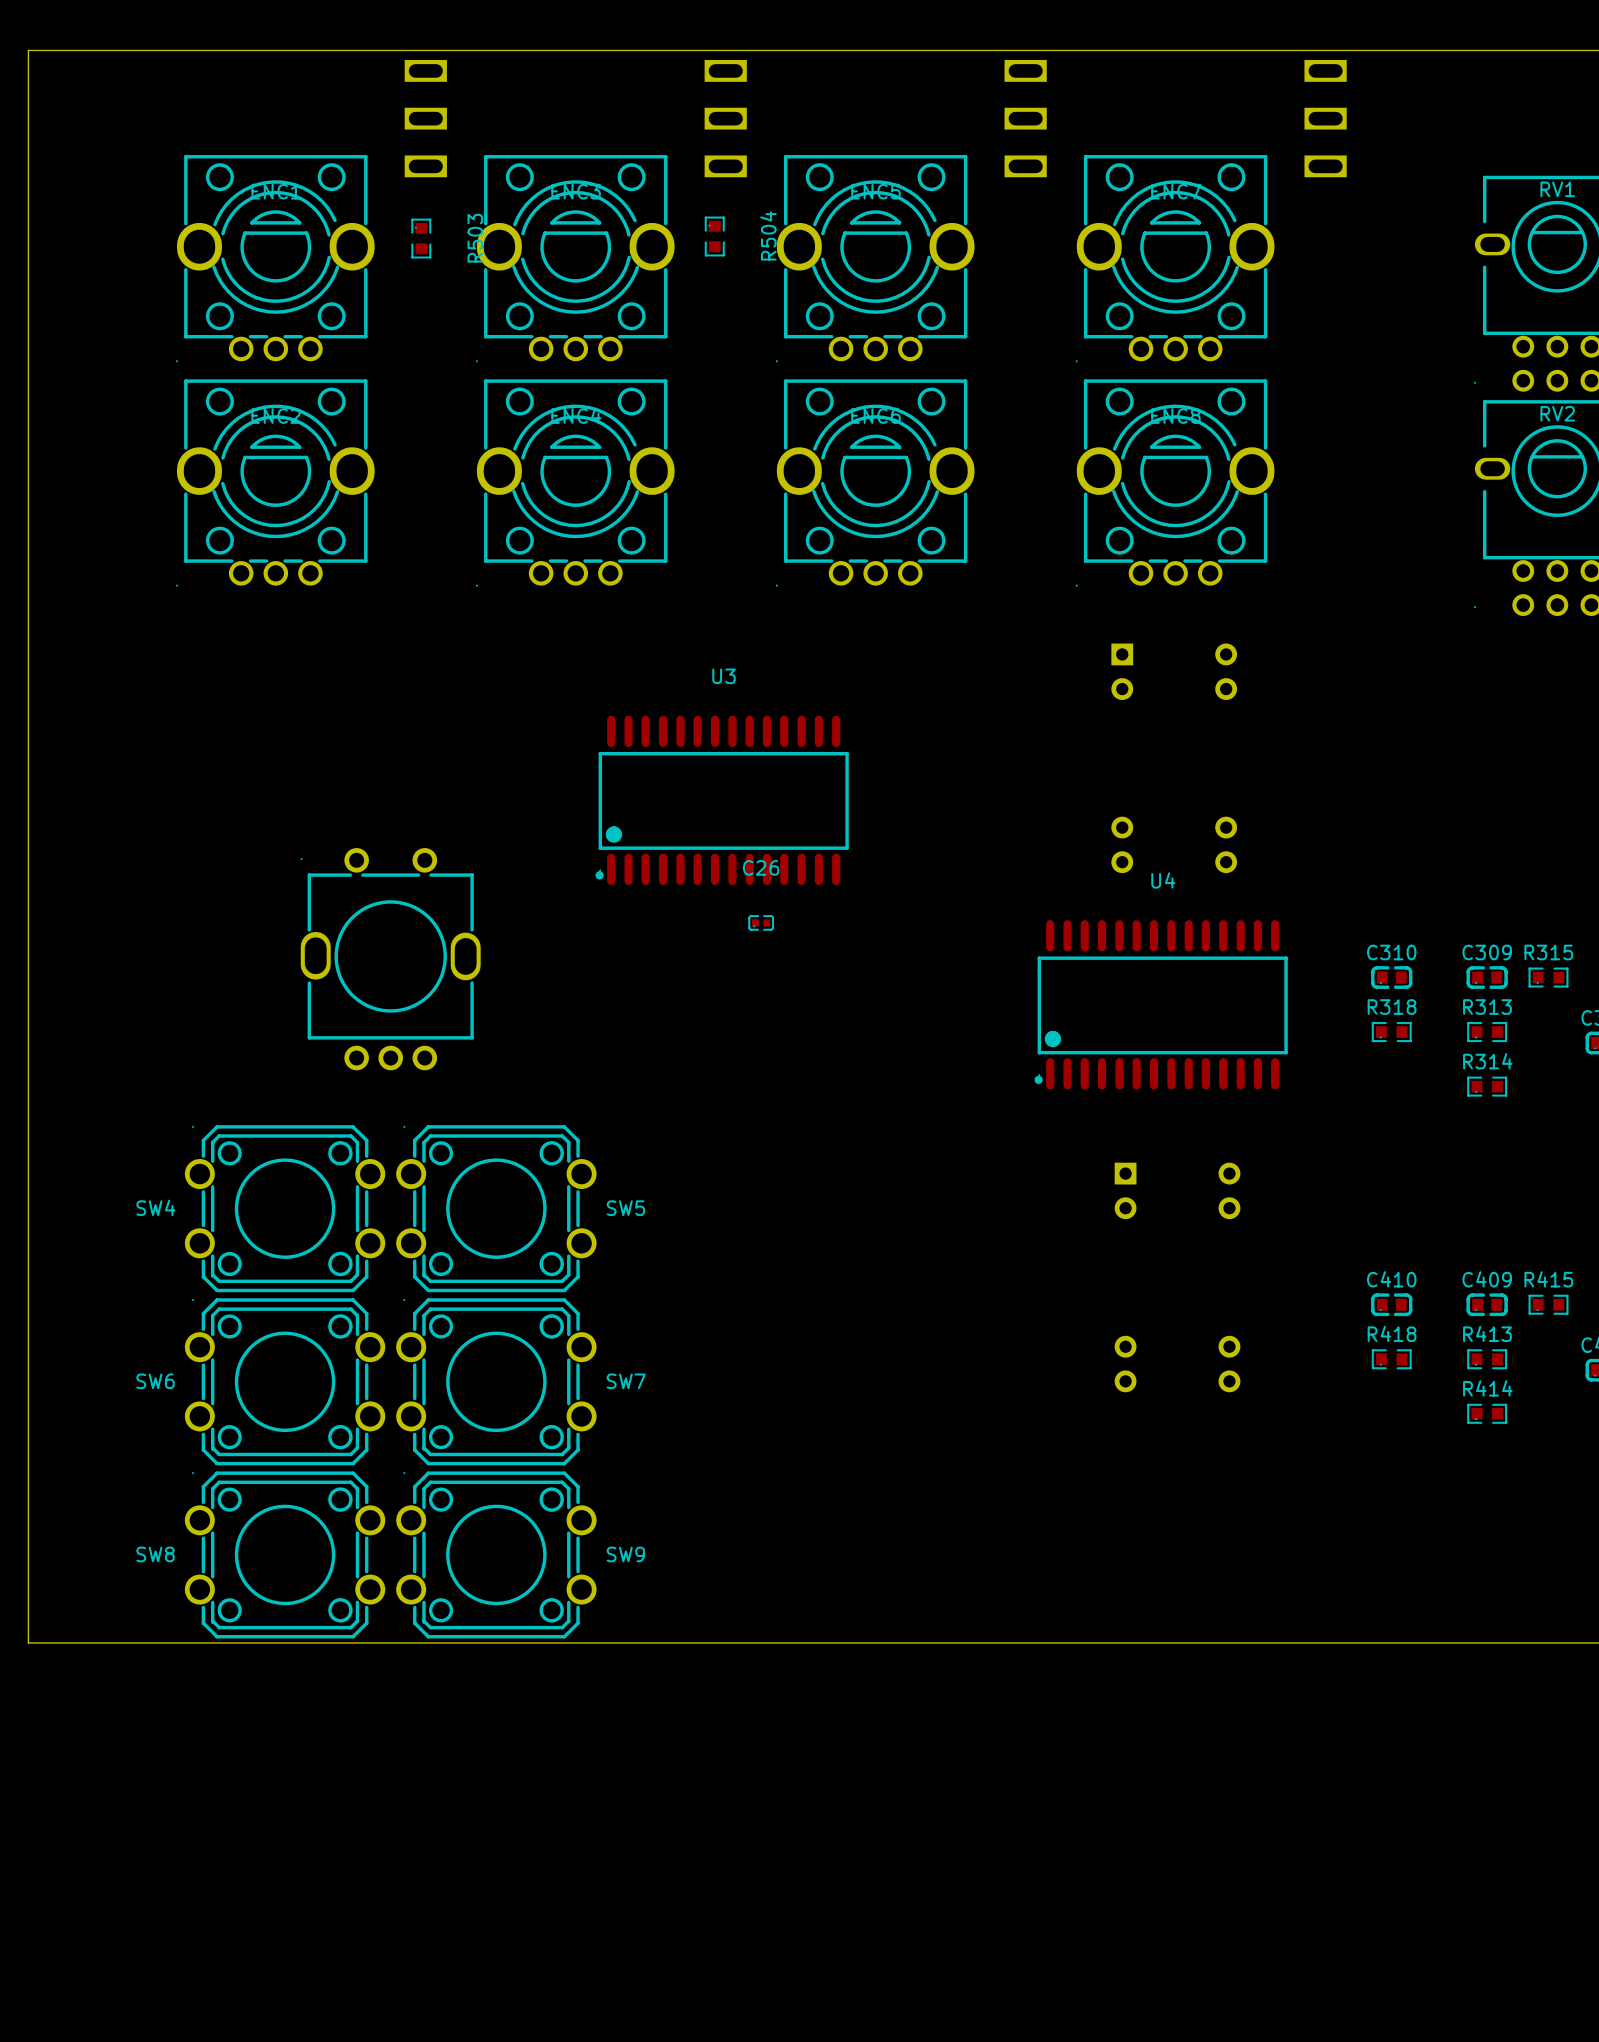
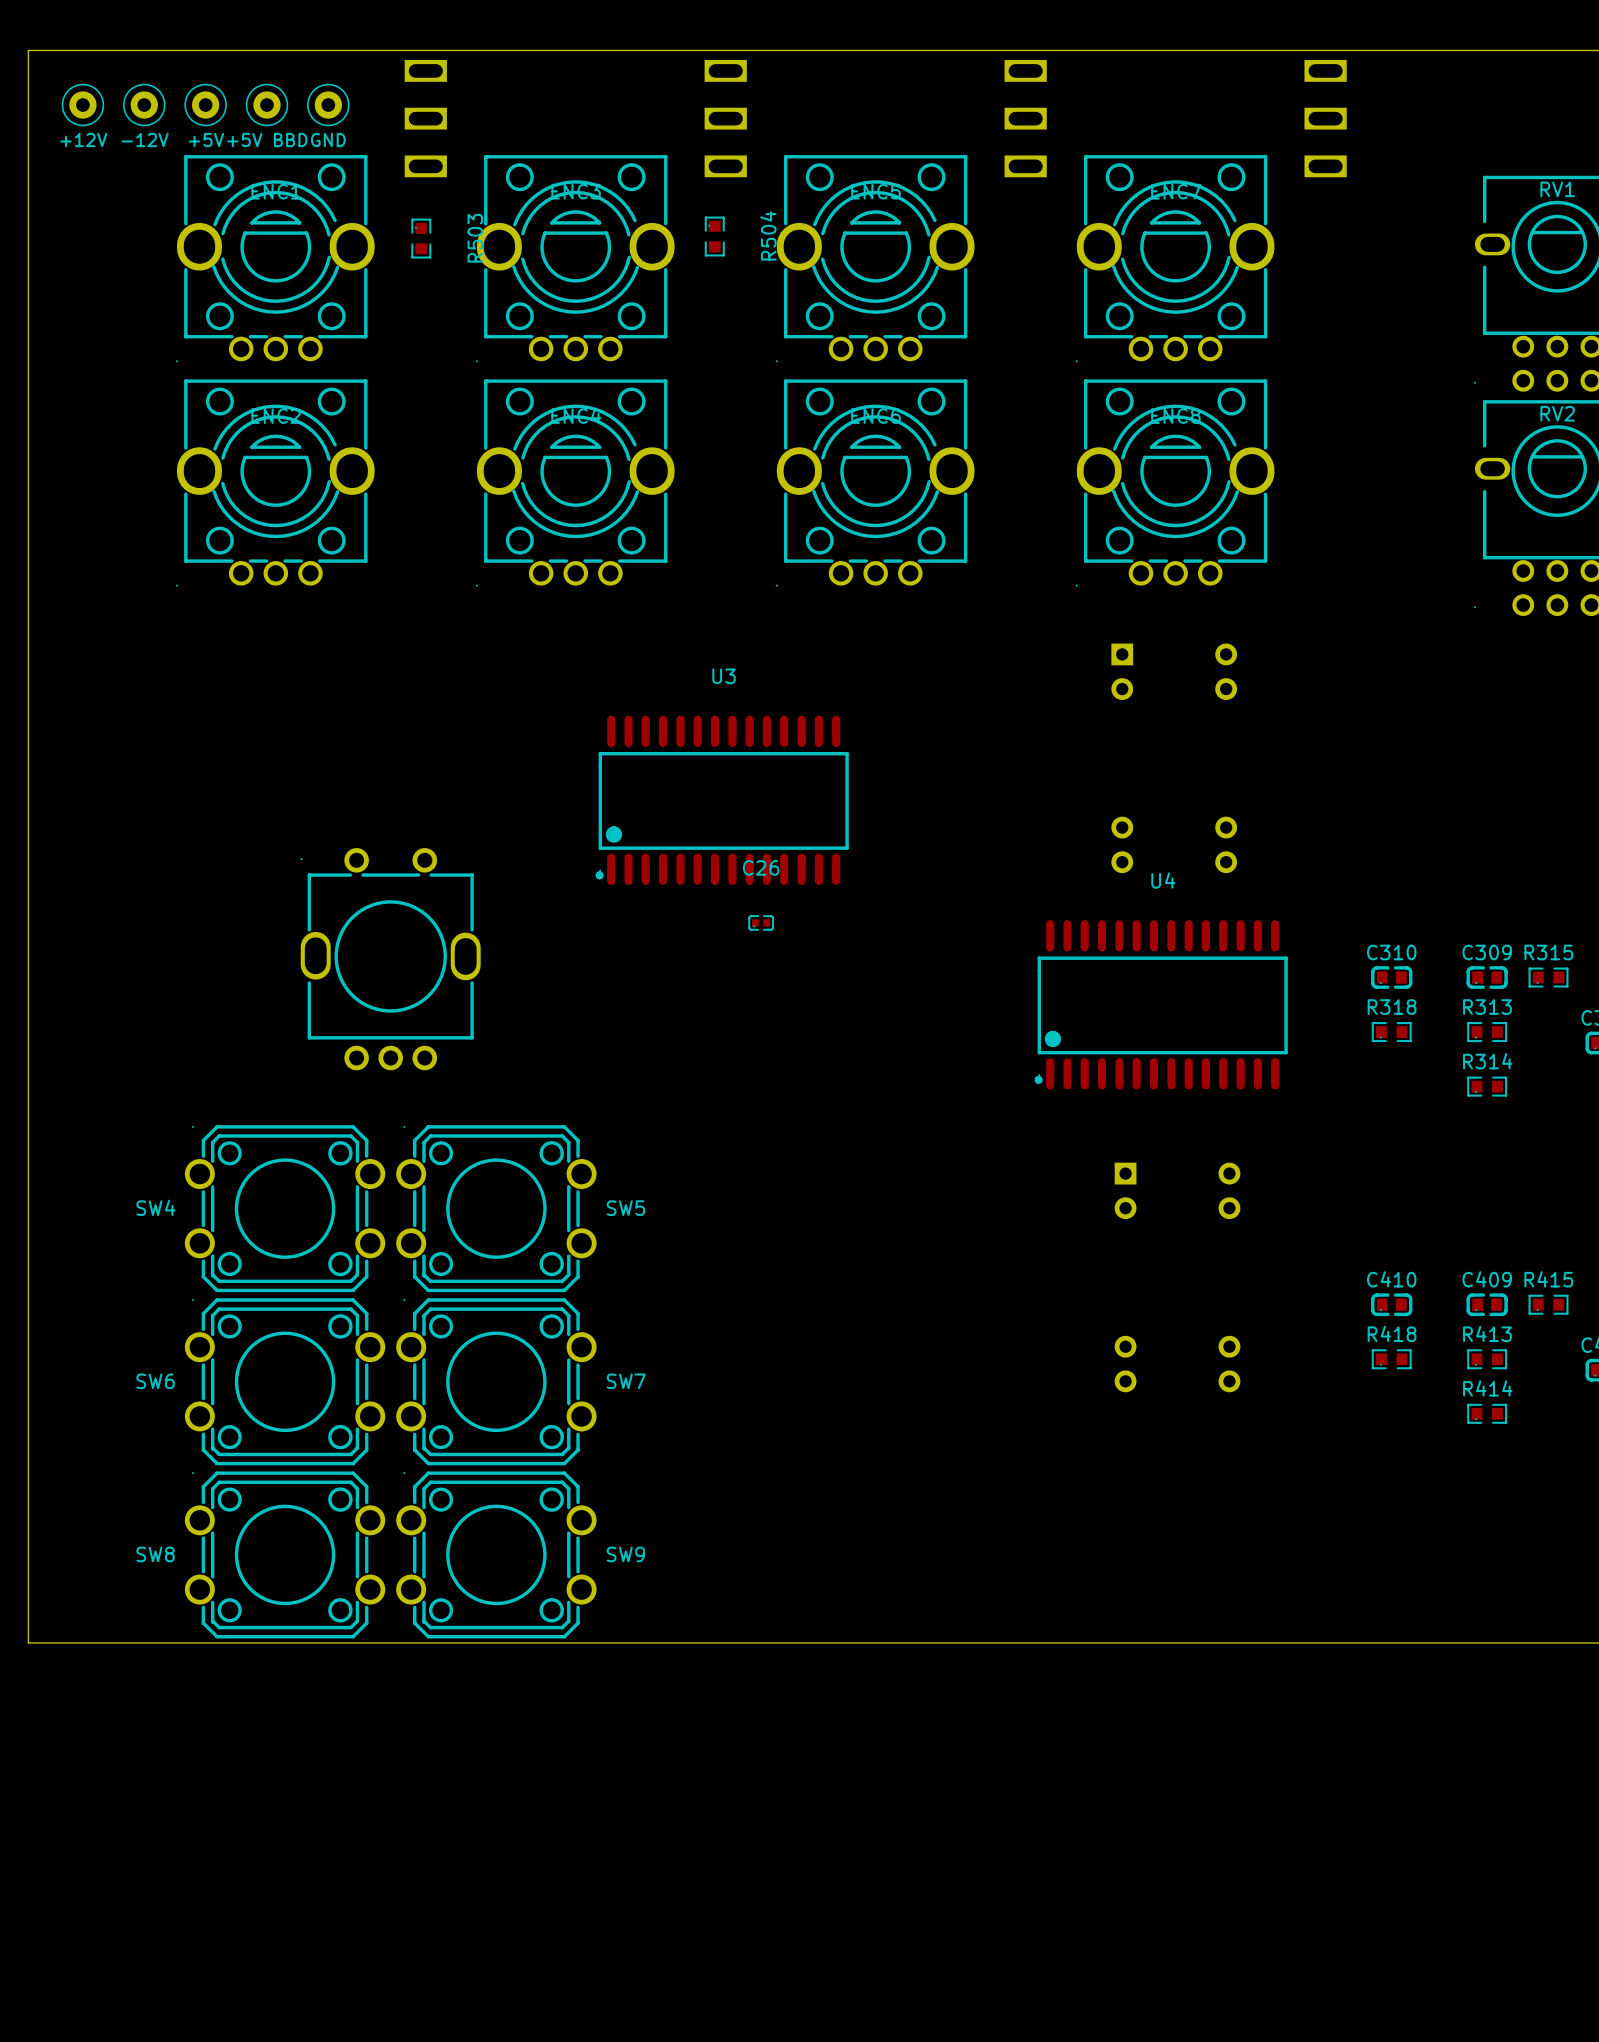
part: none -> +12V (82, 105)
part: none -> -12V (144, 105)
part: none -> +5V (205, 105)
part: none -> +5V BBD (266, 105)
part: none -> GND (328, 105)

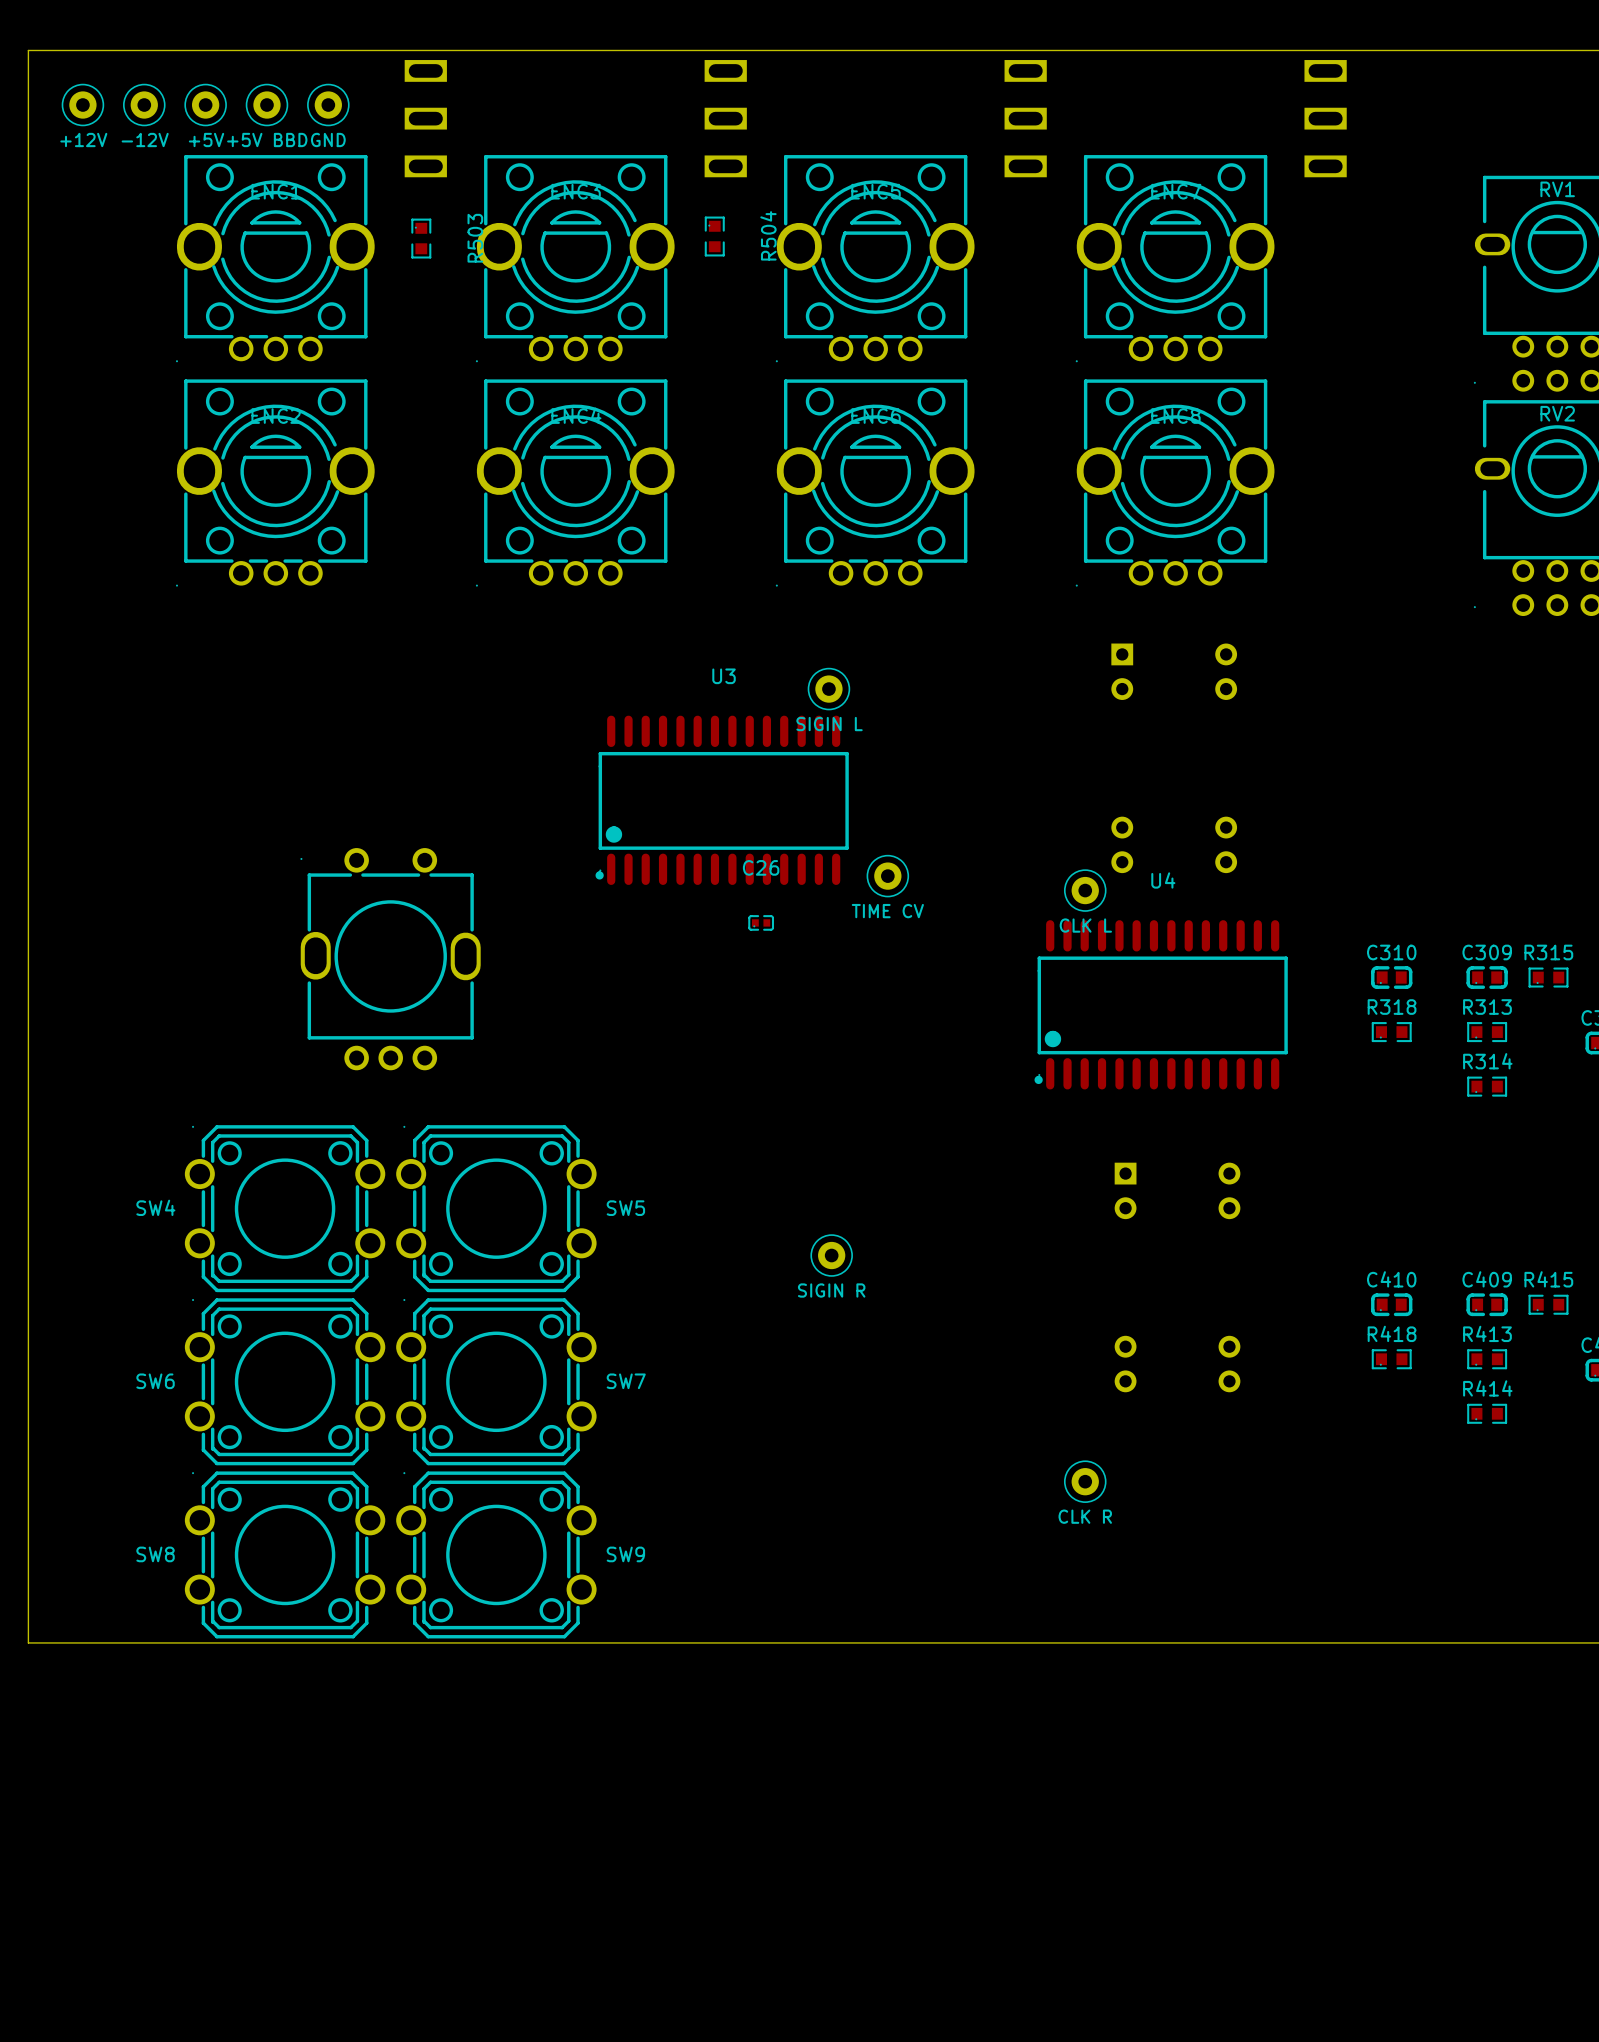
part: none -> SIGIN L (828, 689)
part: none -> TIME CV (887, 876)
part: none -> CLK L (1085, 890)
part: none -> SIGIN R (831, 1255)
part: none -> CLK R (1085, 1481)

